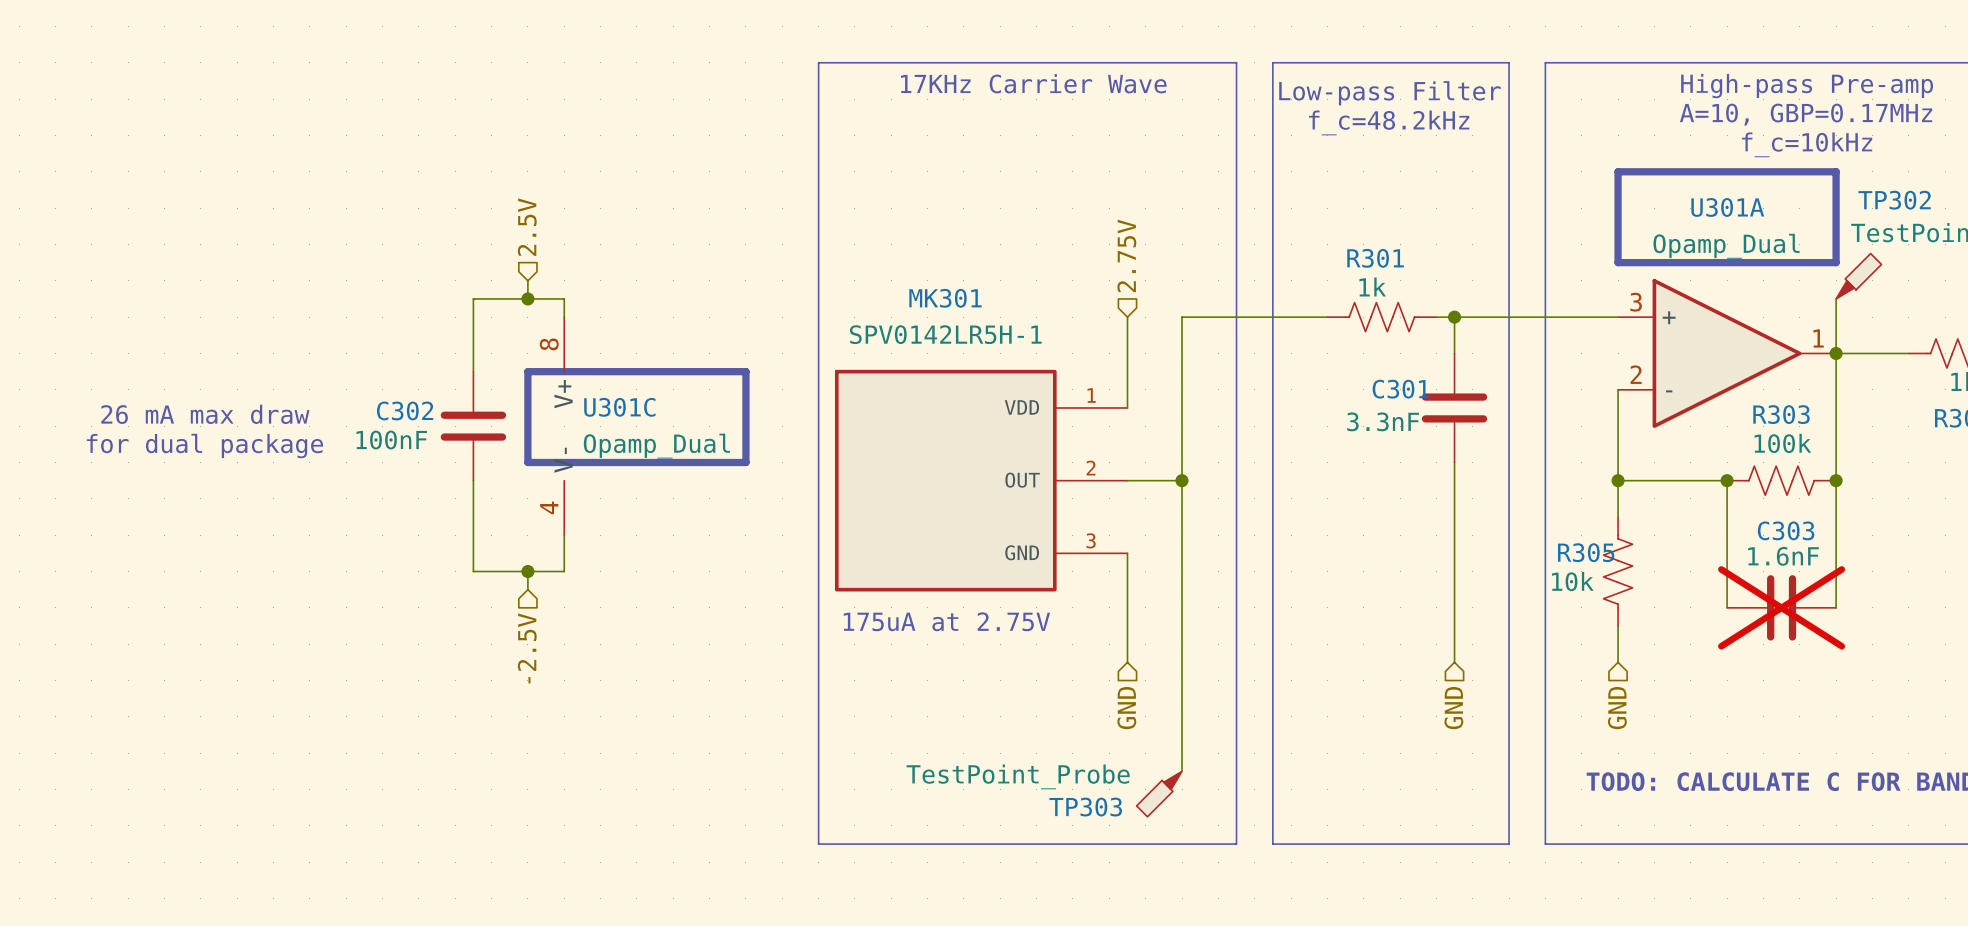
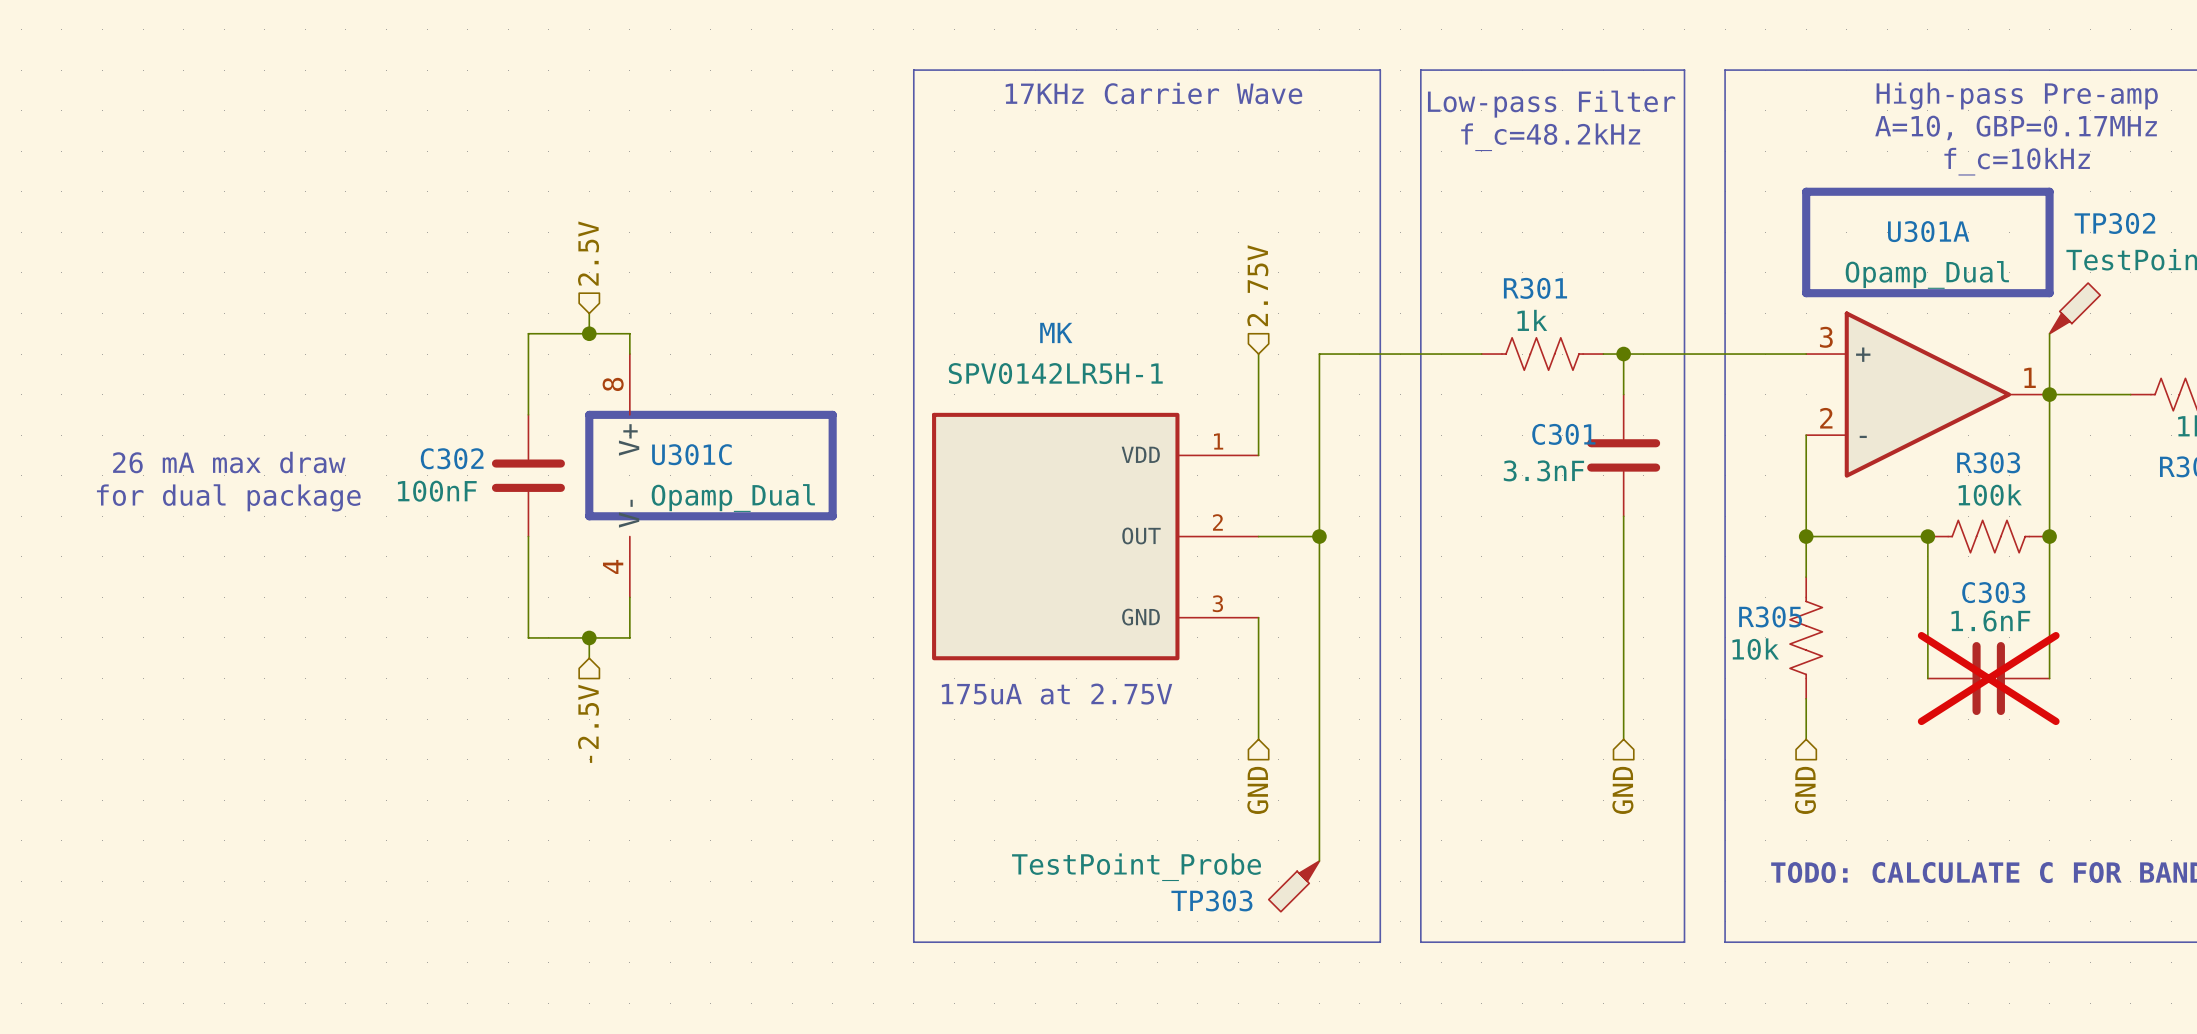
MK301 name: MK301 (945, 298) -> MK (1056, 332)

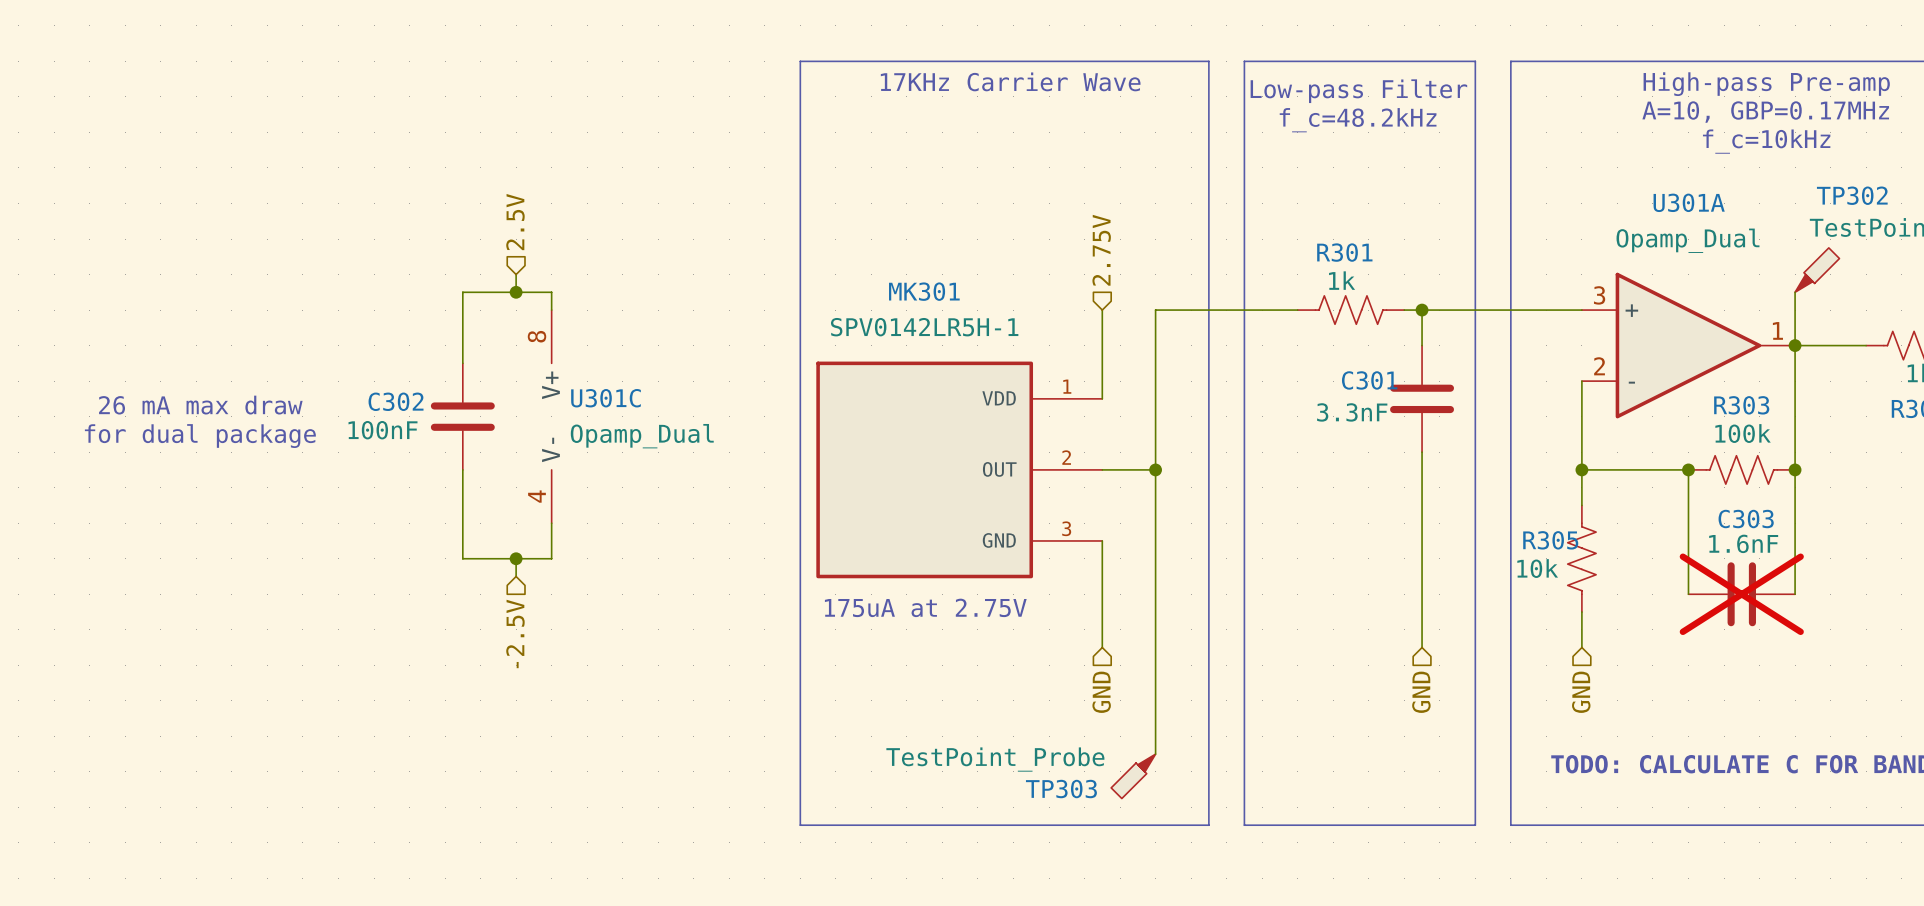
line: (1806, 191) (2049, 191) (2049, 293) (1806, 293) (1806, 191) -> none
MK name: MK (1056, 332) -> MK301 (924, 291)
line: (589, 414) (832, 414) (832, 516) (589, 516) (589, 414) -> none

